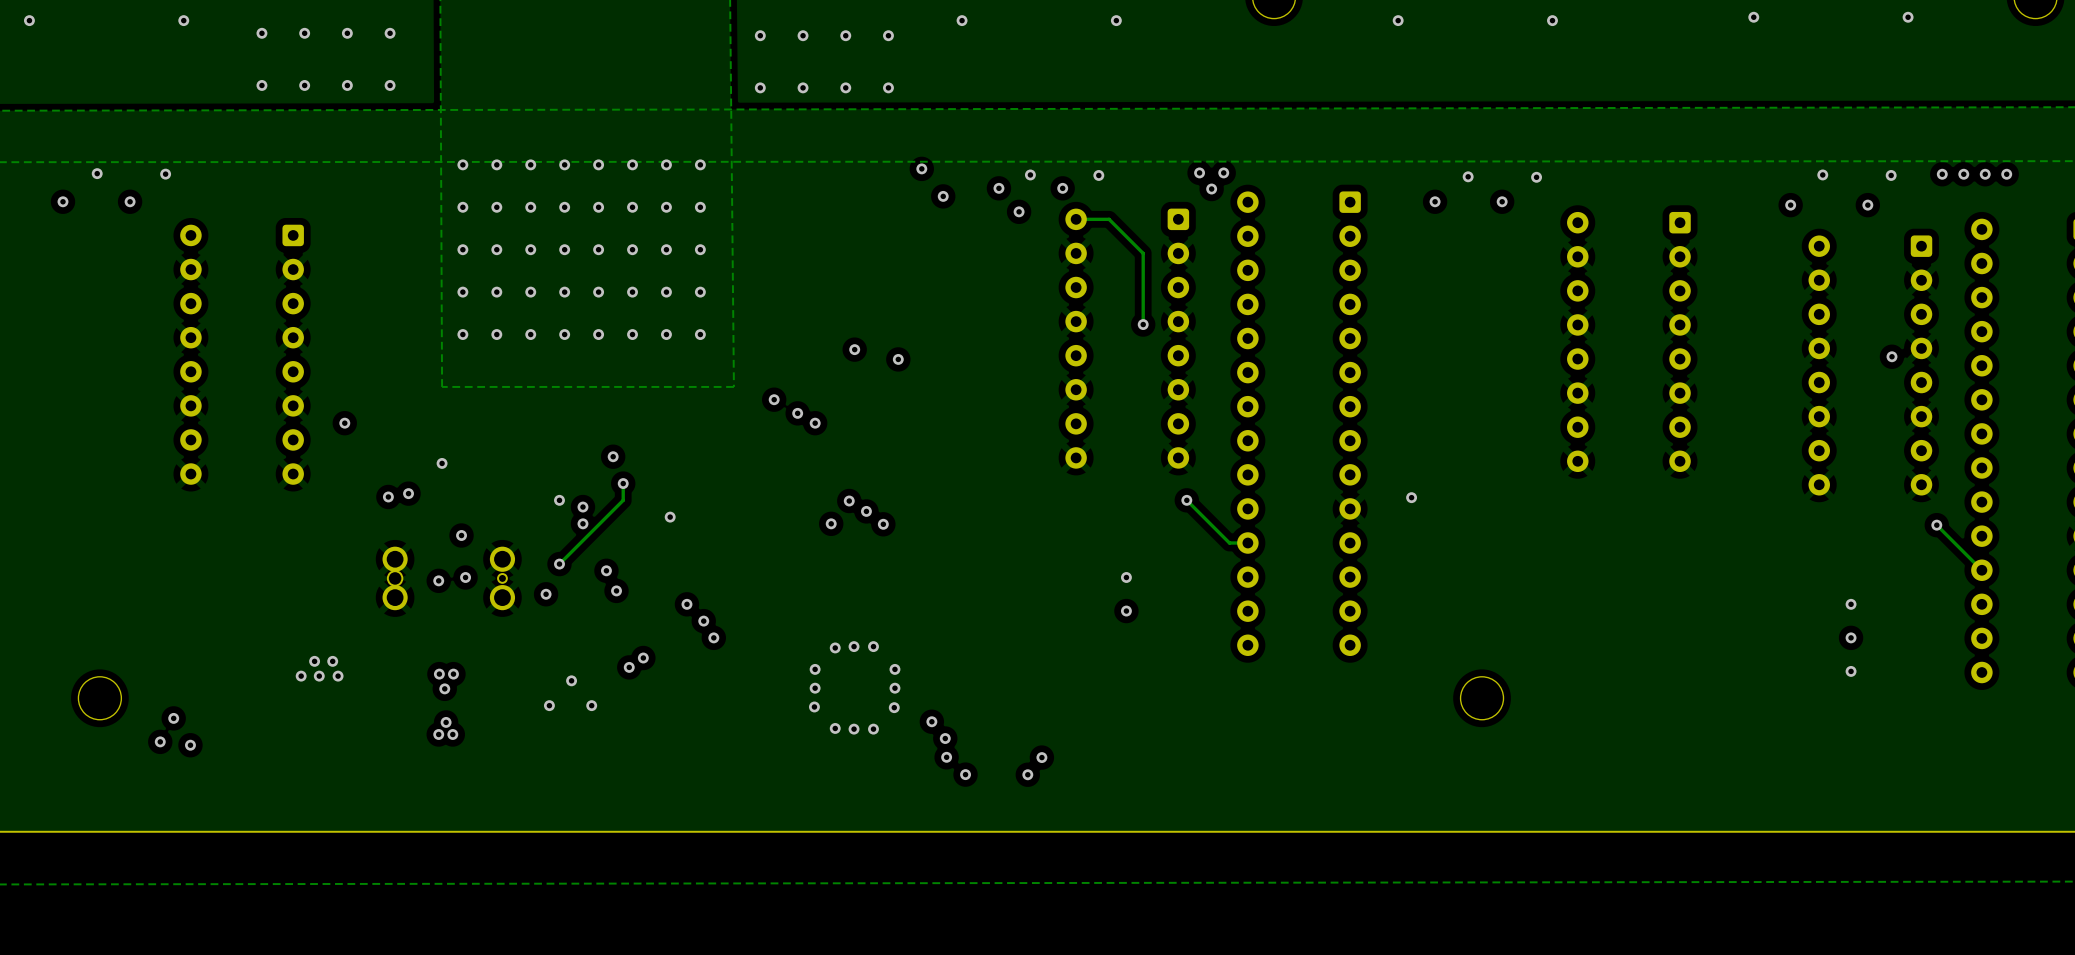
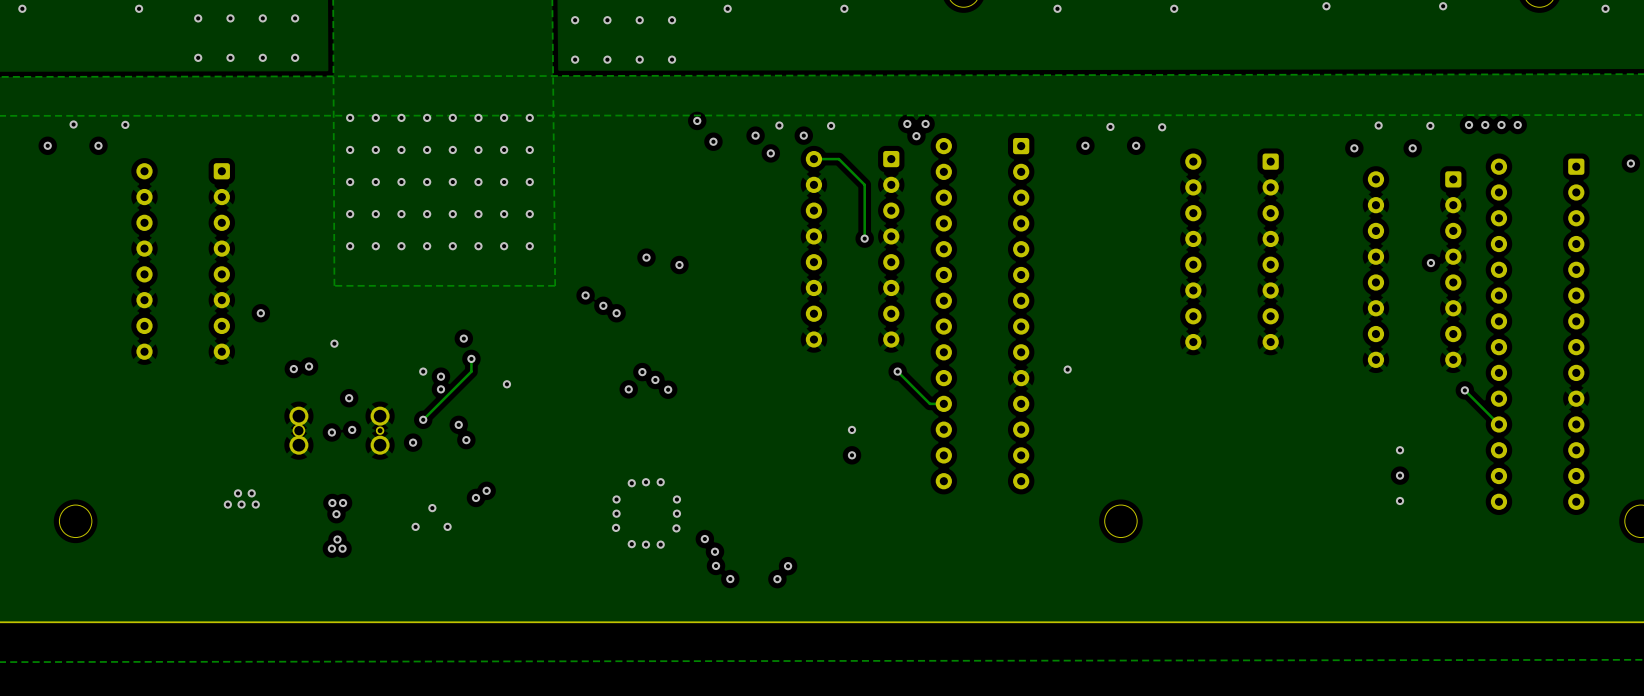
via: (686, 604) -> none
via: (703, 621) -> none
via: (713, 637) -> none
via: (173, 718) -> none
via: (160, 741) -> none
via: (190, 745) -> none

